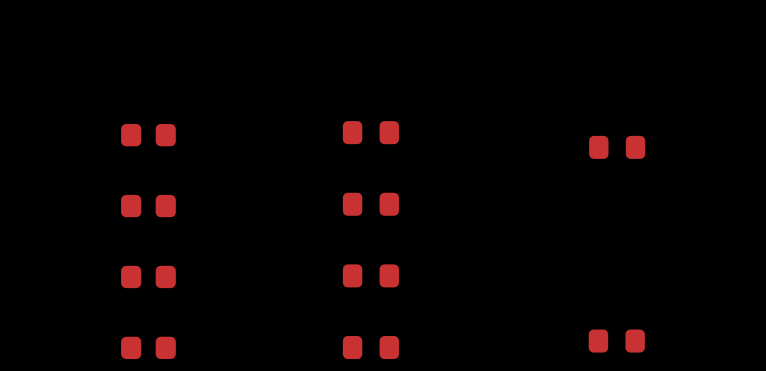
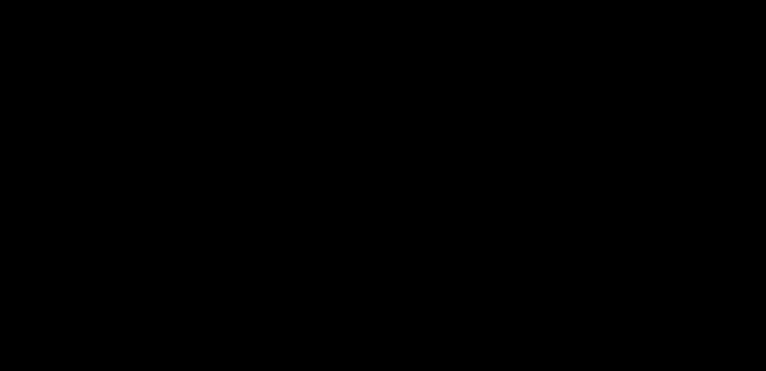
part: (370, 132) -> none
part: (148, 135) -> none
part: (617, 147) -> none
part: (370, 204) -> none
part: (148, 206) -> none
part: (370, 275) -> none
part: (148, 276) -> none
part: (616, 341) -> none
part: (148, 347) -> none
part: (370, 347) -> none

